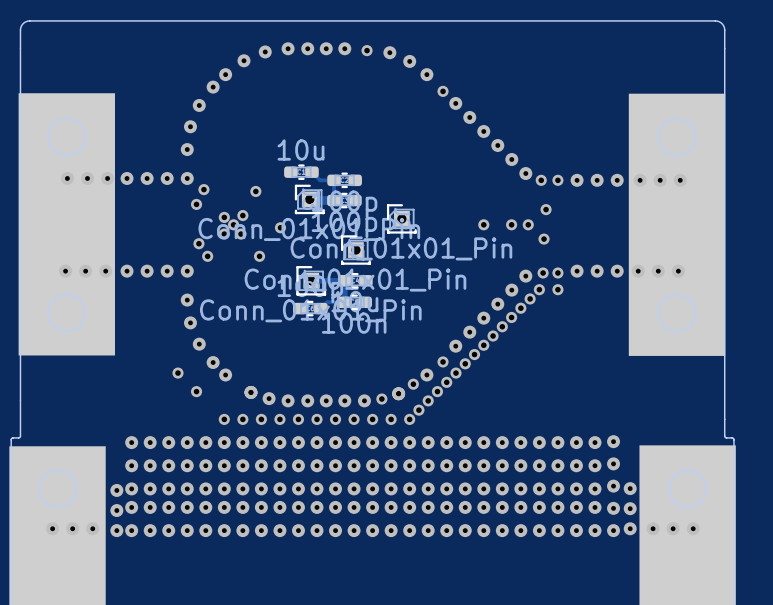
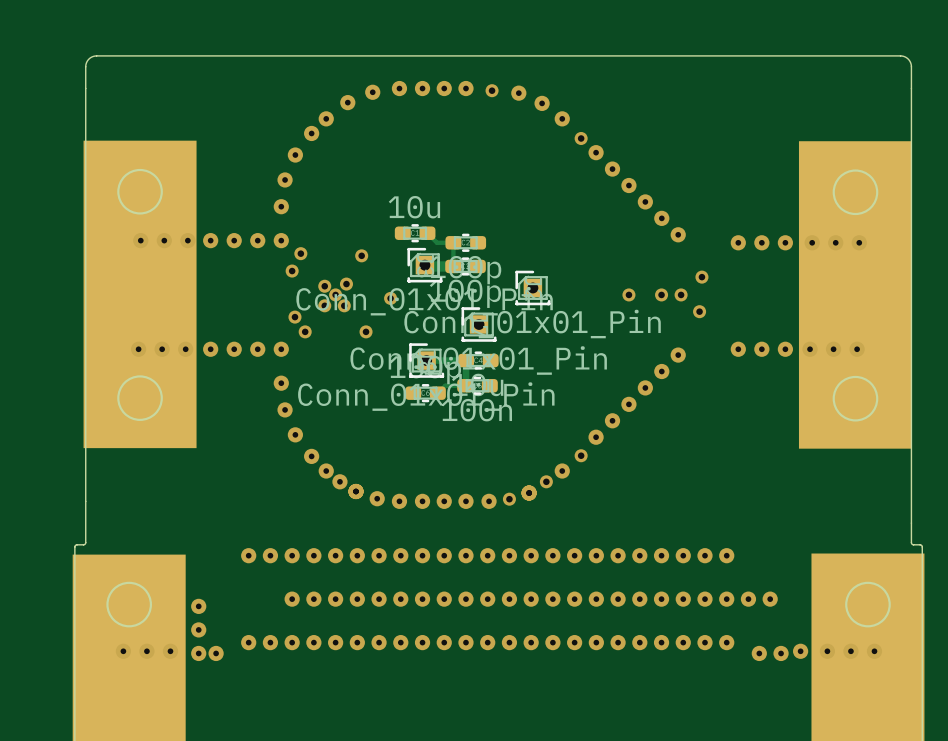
via: (541, 180) -> none
via: (557, 180) -> none
via: (543, 273) -> none
via: (557, 273) -> none
via: (539, 289) -> none
via: (557, 289) -> none
via: (530, 298) -> none
via: (520, 308) -> none
via: (511, 317) -> none
via: (502, 326) -> none
via: (493, 336) -> none
via: (483, 345) -> none
via: (474, 354) -> none
via: (465, 363) -> none
via: (178, 373) -> none
via: (455, 373) -> none
via: (446, 382) -> none
via: none -> (339, 481)
via: (196, 391) -> none
via: (437, 391) -> none
via: (428, 400) -> none
via: (418, 410) -> none
via: (224, 419) -> none
via: (242, 419) -> none
via: (261, 419) -> none
via: (279, 419) -> none
via: (298, 419) -> none
via: (316, 419) -> none
via: (335, 419) -> none
via: (354, 419) -> none
via: (372, 419) -> none
via: (391, 419) -> none
via: (409, 419) -> none
via: (613, 441) -> none
via: (131, 442) -> none
via: (150, 442) -> none
via: (168, 442) -> none
via: (187, 442) -> none
via: (205, 442) -> none
via: (224, 442) -> none
via: (242, 442) -> none
via: (261, 442) -> none
via: (279, 442) -> none
via: (298, 442) -> none
via: (316, 442) -> none
via: (335, 442) -> none
via: (354, 442) -> none
via: (372, 442) -> none
via: (391, 442) -> none
via: (409, 442) -> none
via: (428, 442) -> none
via: (446, 442) -> none
via: (465, 442) -> none
via: (483, 442) -> none
via: (502, 442) -> none
via: (520, 442) -> none
via: (539, 442) -> none
via: (557, 442) -> none
via: (576, 442) -> none
via: (594, 442) -> none
via: none -> (248, 555)
via: none -> (270, 555)
via: none -> (292, 555)
via: none -> (313, 555)
via: none -> (335, 555)
via: none -> (357, 555)
via: none -> (379, 555)
via: none -> (400, 555)
via: none -> (422, 555)
via: none -> (444, 555)
via: none -> (465, 555)
via: none -> (487, 555)
via: none -> (509, 555)
via: none -> (531, 555)
via: none -> (552, 555)
via: none -> (574, 555)
via: none -> (596, 555)
via: none -> (618, 555)
via: none -> (639, 555)
via: none -> (661, 555)
via: none -> (683, 555)
via: none -> (705, 555)
via: none -> (726, 555)
via: (613, 463) -> none
via: (131, 465) -> none
via: (150, 465) -> none
via: (168, 465) -> none
via: (187, 465) -> none
via: (205, 465) -> none
via: (224, 465) -> none
via: (242, 465) -> none
via: (261, 465) -> none
via: (279, 465) -> none
via: (298, 465) -> none
via: (316, 465) -> none
via: (335, 465) -> none
via: (354, 465) -> none
via: (372, 465) -> none
via: (391, 465) -> none
via: (409, 465) -> none
via: (428, 465) -> none
via: (446, 465) -> none
via: (465, 465) -> none
via: (483, 465) -> none
via: (502, 465) -> none
via: (520, 465) -> none
via: (539, 465) -> none
via: (557, 465) -> none
via: (576, 465) -> none
via: (594, 465) -> none
via: none -> (292, 599)
via: none -> (313, 599)
via: none -> (335, 599)
via: none -> (357, 599)
via: none -> (379, 599)
via: none -> (400, 599)
via: none -> (422, 599)
via: none -> (444, 599)
via: none -> (465, 599)
via: none -> (487, 599)
via: none -> (509, 599)
via: none -> (531, 599)
via: none -> (552, 599)
via: none -> (574, 599)
via: none -> (596, 599)
via: none -> (618, 599)
via: none -> (639, 599)
via: none -> (661, 599)
via: none -> (683, 599)
via: none -> (705, 599)
via: none -> (726, 599)
via: none -> (748, 599)
via: none -> (770, 599)
via: (613, 486) -> none
via: (131, 488) -> none
via: (150, 488) -> none
via: (168, 488) -> none
via: (187, 488) -> none
via: (205, 488) -> none
via: (224, 488) -> none
via: (242, 488) -> none
via: (261, 488) -> none
via: (279, 488) -> none
via: (298, 488) -> none
via: (316, 488) -> none
via: (335, 488) -> none
via: (354, 488) -> none
via: (372, 488) -> none
via: (391, 488) -> none
via: (409, 488) -> none
via: (428, 488) -> none
via: (446, 488) -> none
via: (465, 488) -> none
via: (483, 488) -> none
via: (502, 488) -> none
via: (520, 488) -> none
via: (539, 488) -> none
via: (557, 488) -> none
via: (576, 488) -> none
via: (594, 488) -> none
via: (630, 488) -> none
via: (131, 507) -> none
via: (150, 507) -> none
via: (168, 507) -> none
via: (187, 507) -> none
via: (205, 507) -> none
via: (224, 507) -> none
via: (242, 507) -> none
via: (261, 507) -> none
via: (279, 507) -> none
via: (298, 507) -> none
via: (316, 507) -> none
via: (335, 507) -> none
via: (354, 507) -> none
via: (372, 507) -> none
via: (391, 507) -> none
via: (409, 507) -> none
via: (428, 507) -> none
via: (446, 507) -> none
via: (465, 507) -> none
via: (483, 507) -> none
via: (502, 507) -> none
via: (520, 507) -> none
via: (539, 507) -> none
via: (557, 507) -> none
via: (576, 507) -> none
via: (594, 507) -> none
via: (613, 508) -> none
via: (630, 508) -> none
via: none -> (248, 642)
via: none -> (270, 642)
via: none -> (292, 642)
via: none -> (313, 642)
via: none -> (335, 642)
via: none -> (357, 642)
via: none -> (379, 642)
via: none -> (400, 642)
via: none -> (422, 642)
via: none -> (444, 642)
via: none -> (465, 642)
via: none -> (487, 642)
via: none -> (509, 642)
via: none -> (531, 642)
via: none -> (552, 642)
via: none -> (574, 642)
via: none -> (596, 642)
via: none -> (618, 642)
via: none -> (639, 642)
via: none -> (661, 642)
via: none -> (683, 642)
via: none -> (705, 642)
via: none -> (726, 642)
via: (150, 530) -> none
via: (168, 530) -> none
via: (187, 530) -> none
via: (205, 530) -> none
via: (224, 530) -> none
via: (242, 530) -> none
via: (261, 530) -> none
via: (279, 530) -> none
via: (298, 530) -> none
via: (316, 530) -> none
via: (335, 530) -> none
via: (354, 530) -> none
via: (372, 530) -> none
via: (391, 530) -> none
via: (409, 530) -> none
via: (428, 530) -> none
via: (446, 530) -> none
via: (465, 530) -> none
via: (483, 530) -> none
via: (502, 530) -> none
via: (520, 530) -> none
via: (539, 530) -> none
via: (557, 530) -> none
via: (576, 530) -> none

